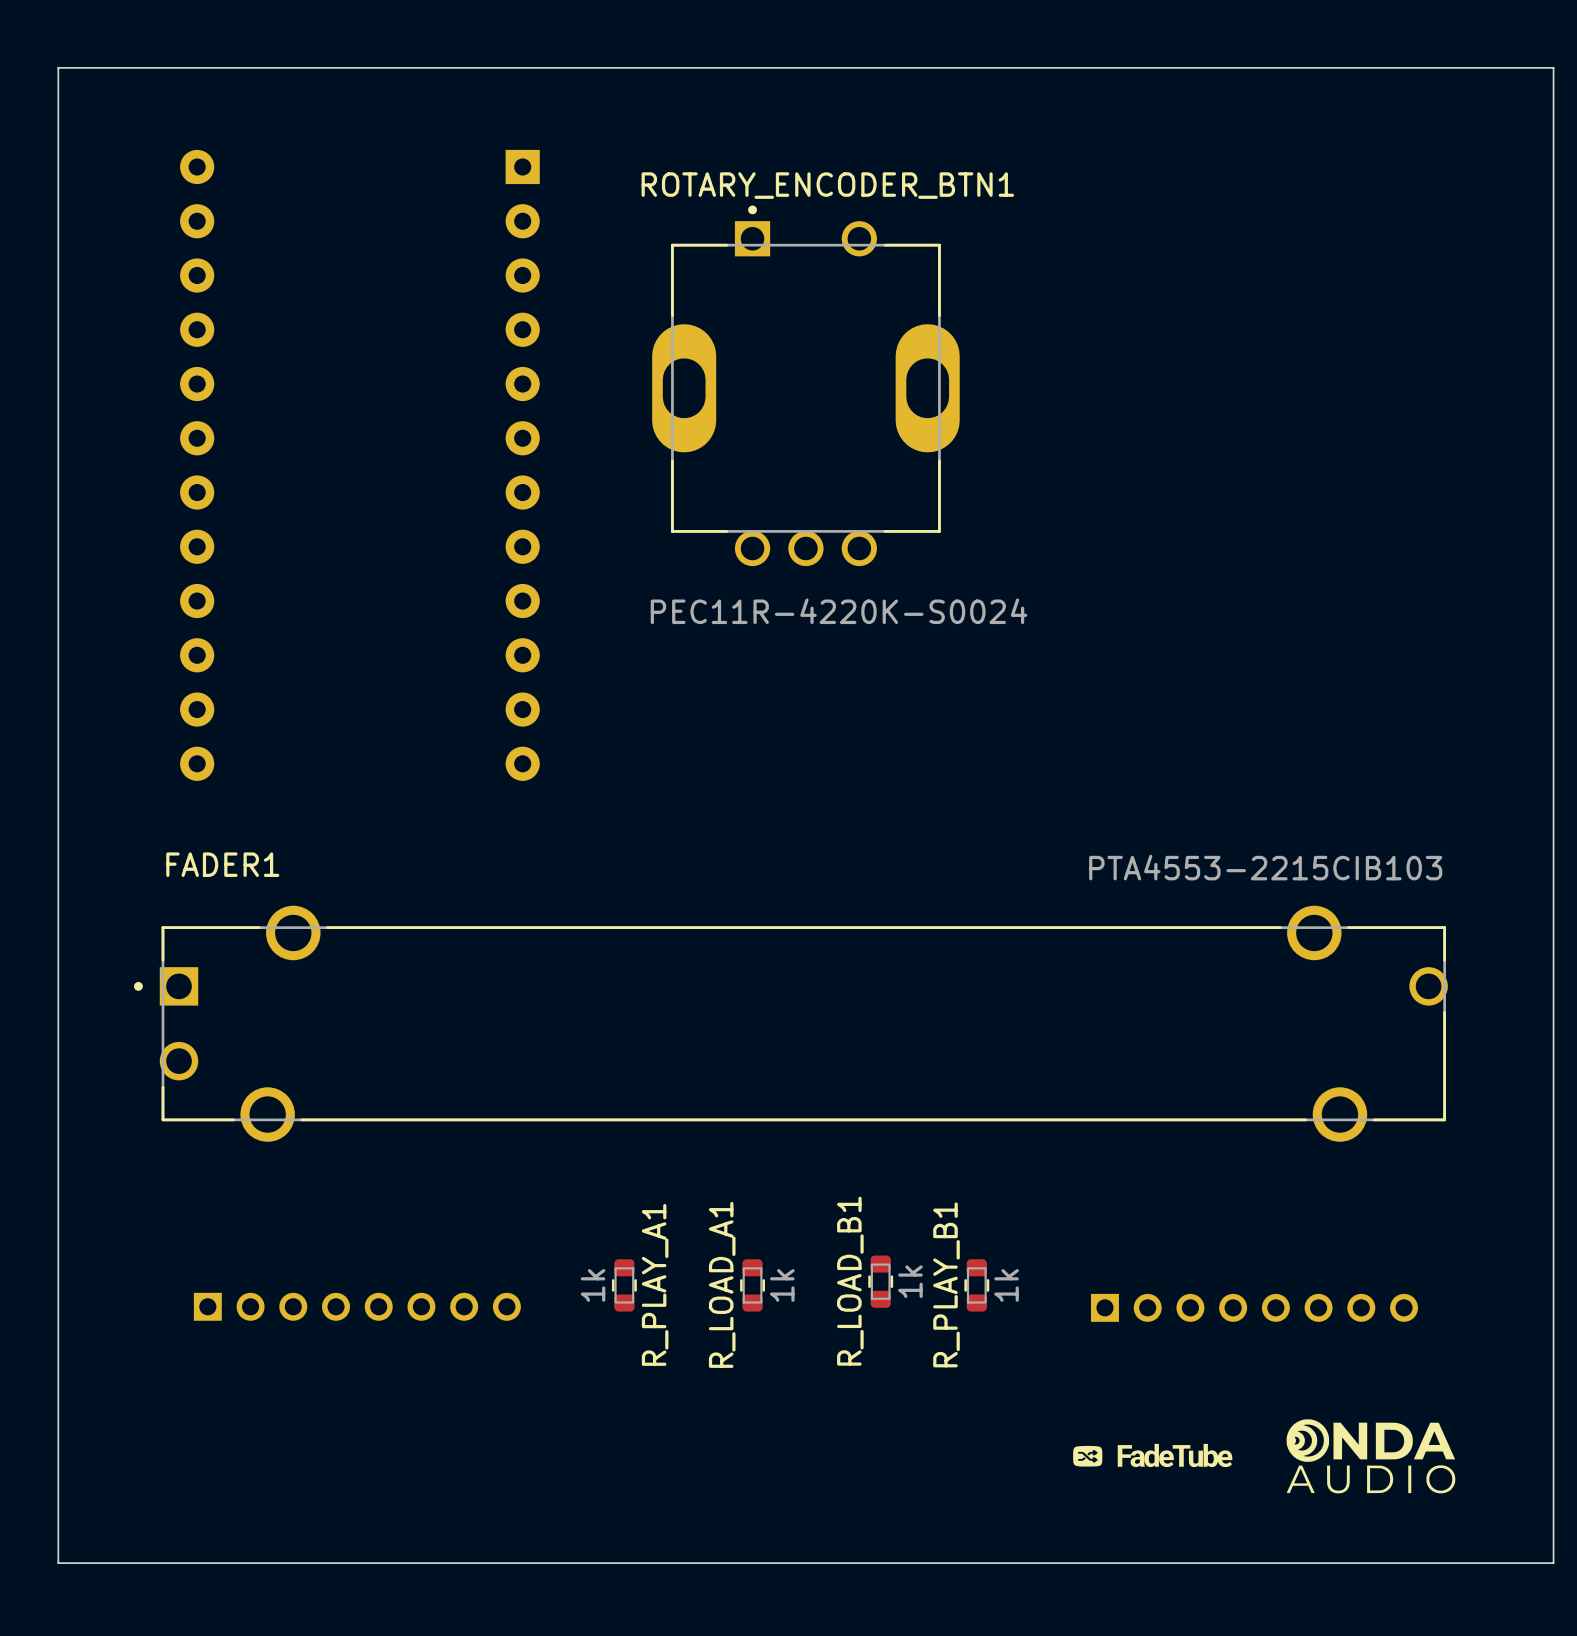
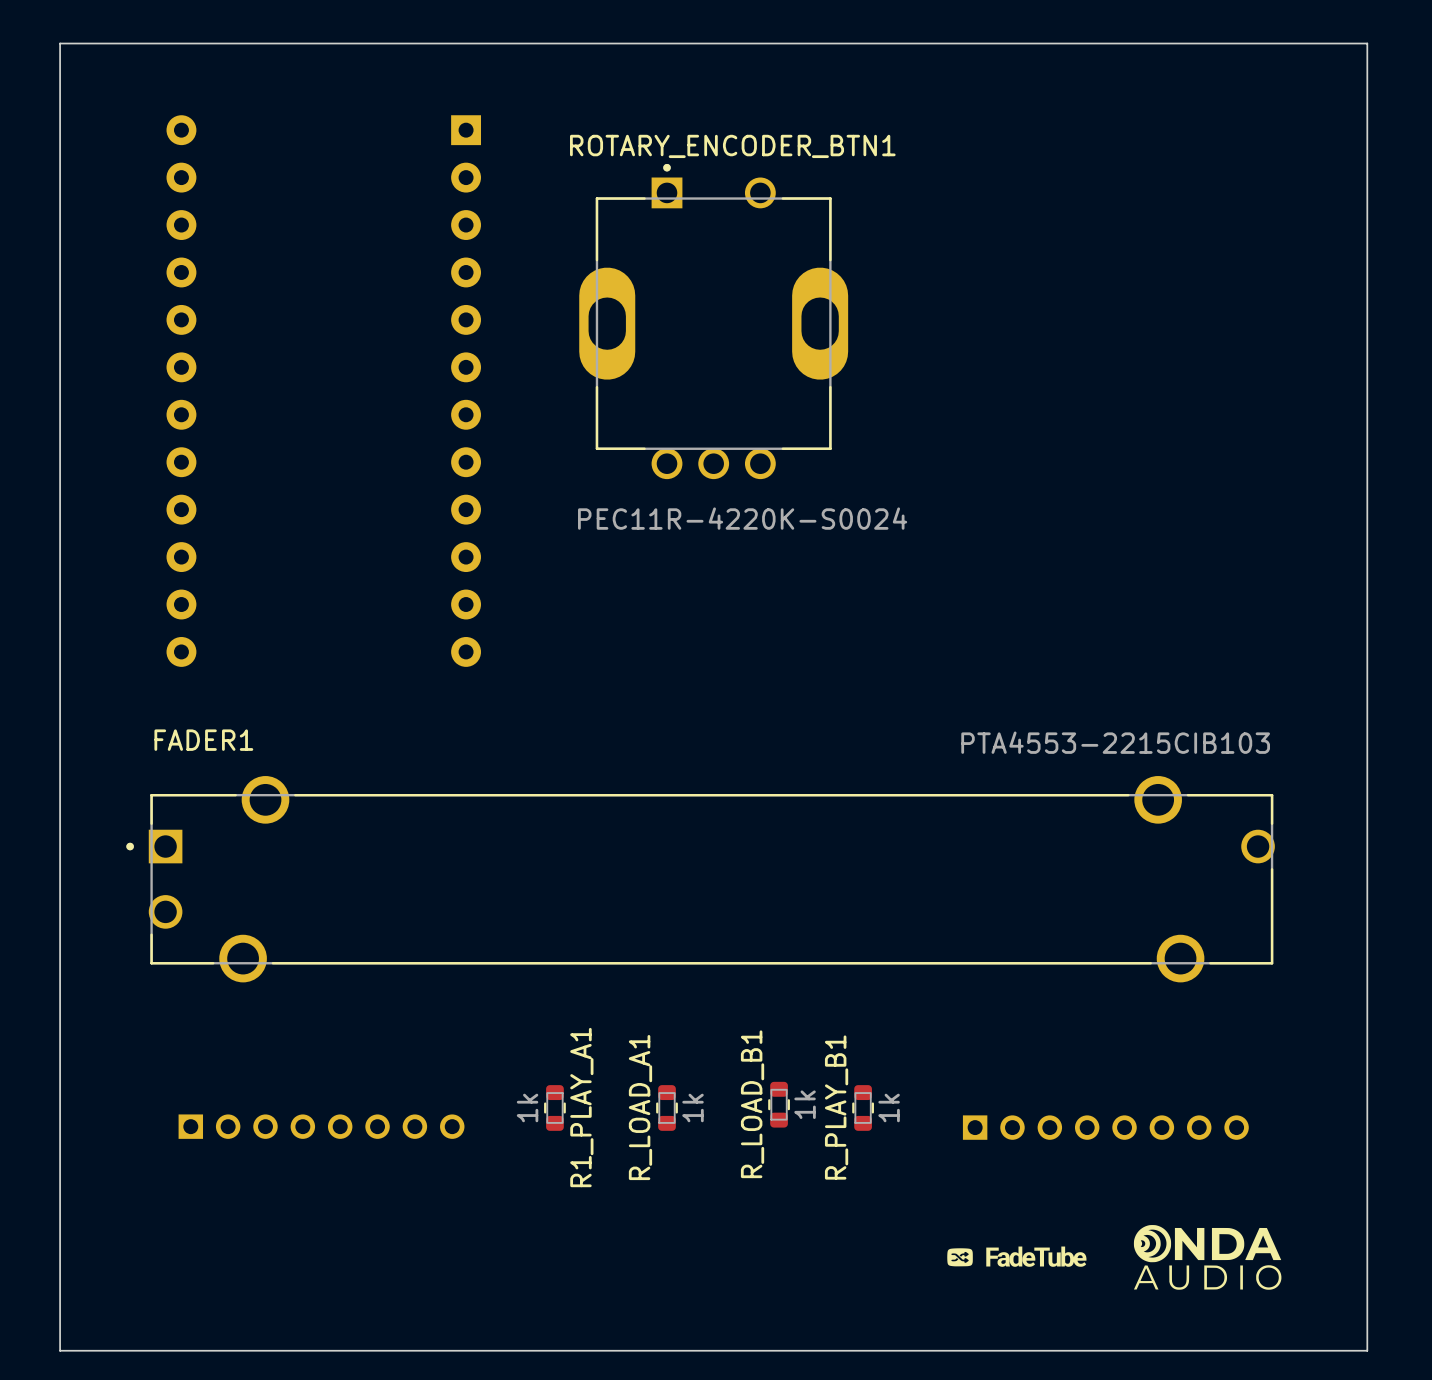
R_PLAY_A1 name: R_PLAY_A1 (655, 1284) -> R1_PLAY_A1 (581, 1107)

